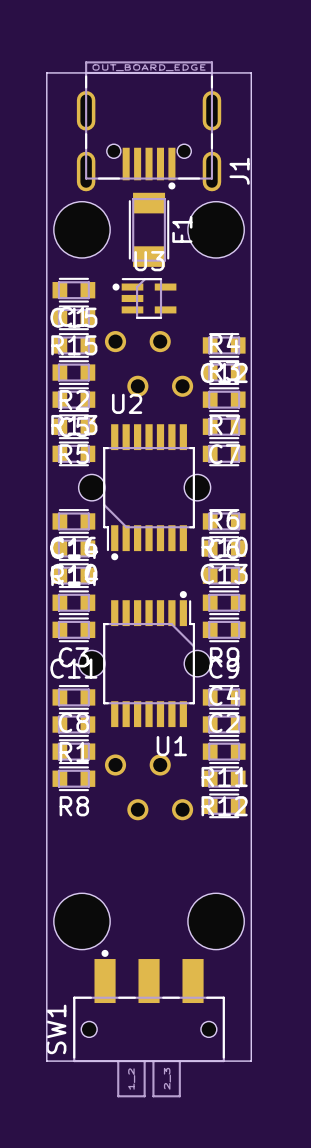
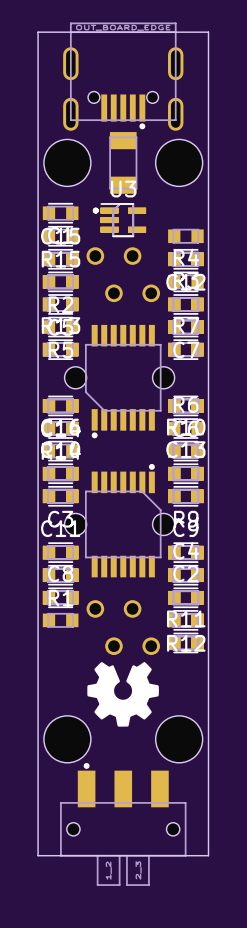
J1: (149, 126) -> none
part: none -> (123, 76)
F1: (149, 229) -> none
part: none -> (123, 162)
part: none -> (119, 220)
part: none -> (185, 236)
part: none -> (60, 259)
part: none -> (185, 259)
part: none -> (60, 281)
part: none -> (60, 304)
part: none -> (185, 304)
part: none -> (185, 327)
part: none -> (60, 349)
part: none -> (185, 349)
U2: (149, 492) -> none
part: none -> (123, 381)
part: none -> (60, 405)
part: none -> (185, 405)
part: none -> (60, 428)
part: none -> (185, 451)
part: none -> (60, 473)
part: none -> (185, 473)
part: none -> (60, 496)
part: none -> (185, 496)
U1: (149, 659) -> none
part: none -> (123, 520)
part: none -> (60, 552)
part: none -> (185, 552)
part: none -> (60, 575)
part: none -> (185, 575)
part: none -> (60, 597)
part: none -> (185, 597)
R8: (73, 778) -> none
part: none -> (60, 620)
part: none -> (185, 620)
part: none -> (185, 642)
drawing: none -> [87, 662, 159, 727]
SW1: (149, 1023) -> none
part: none -> (123, 824)

